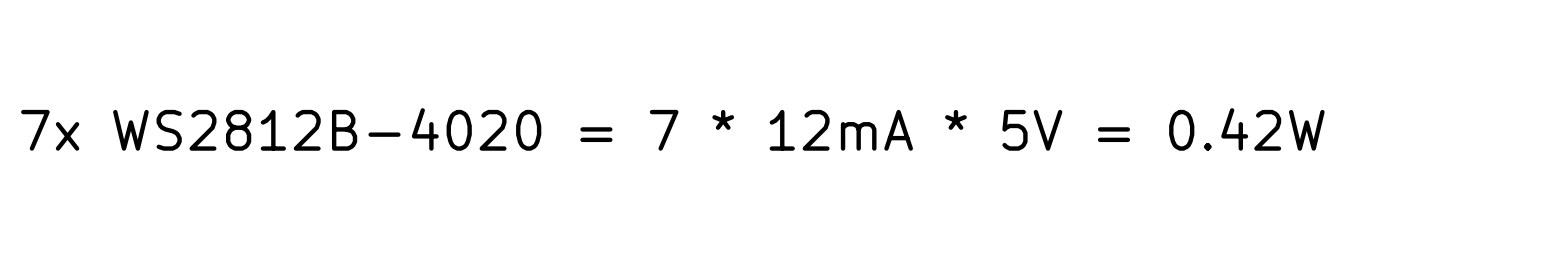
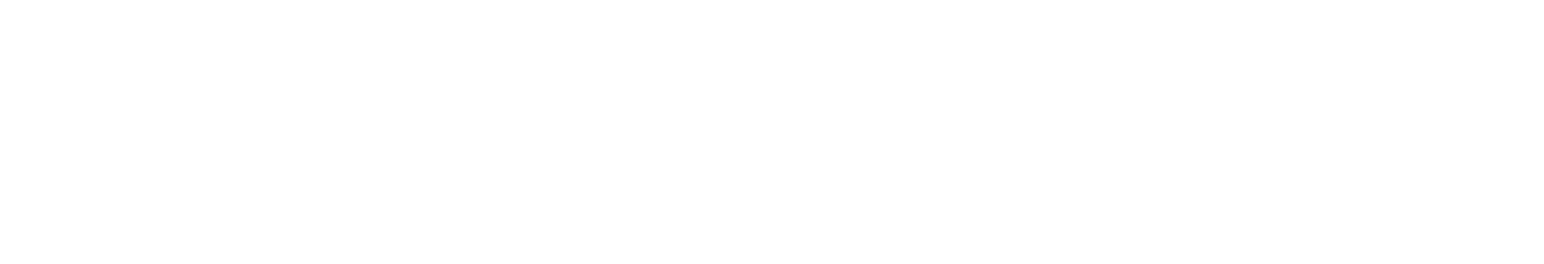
text: 7x WS2812B-4020 = 7 * 12mA * 5V = 0.42W (672, 129) -> none

